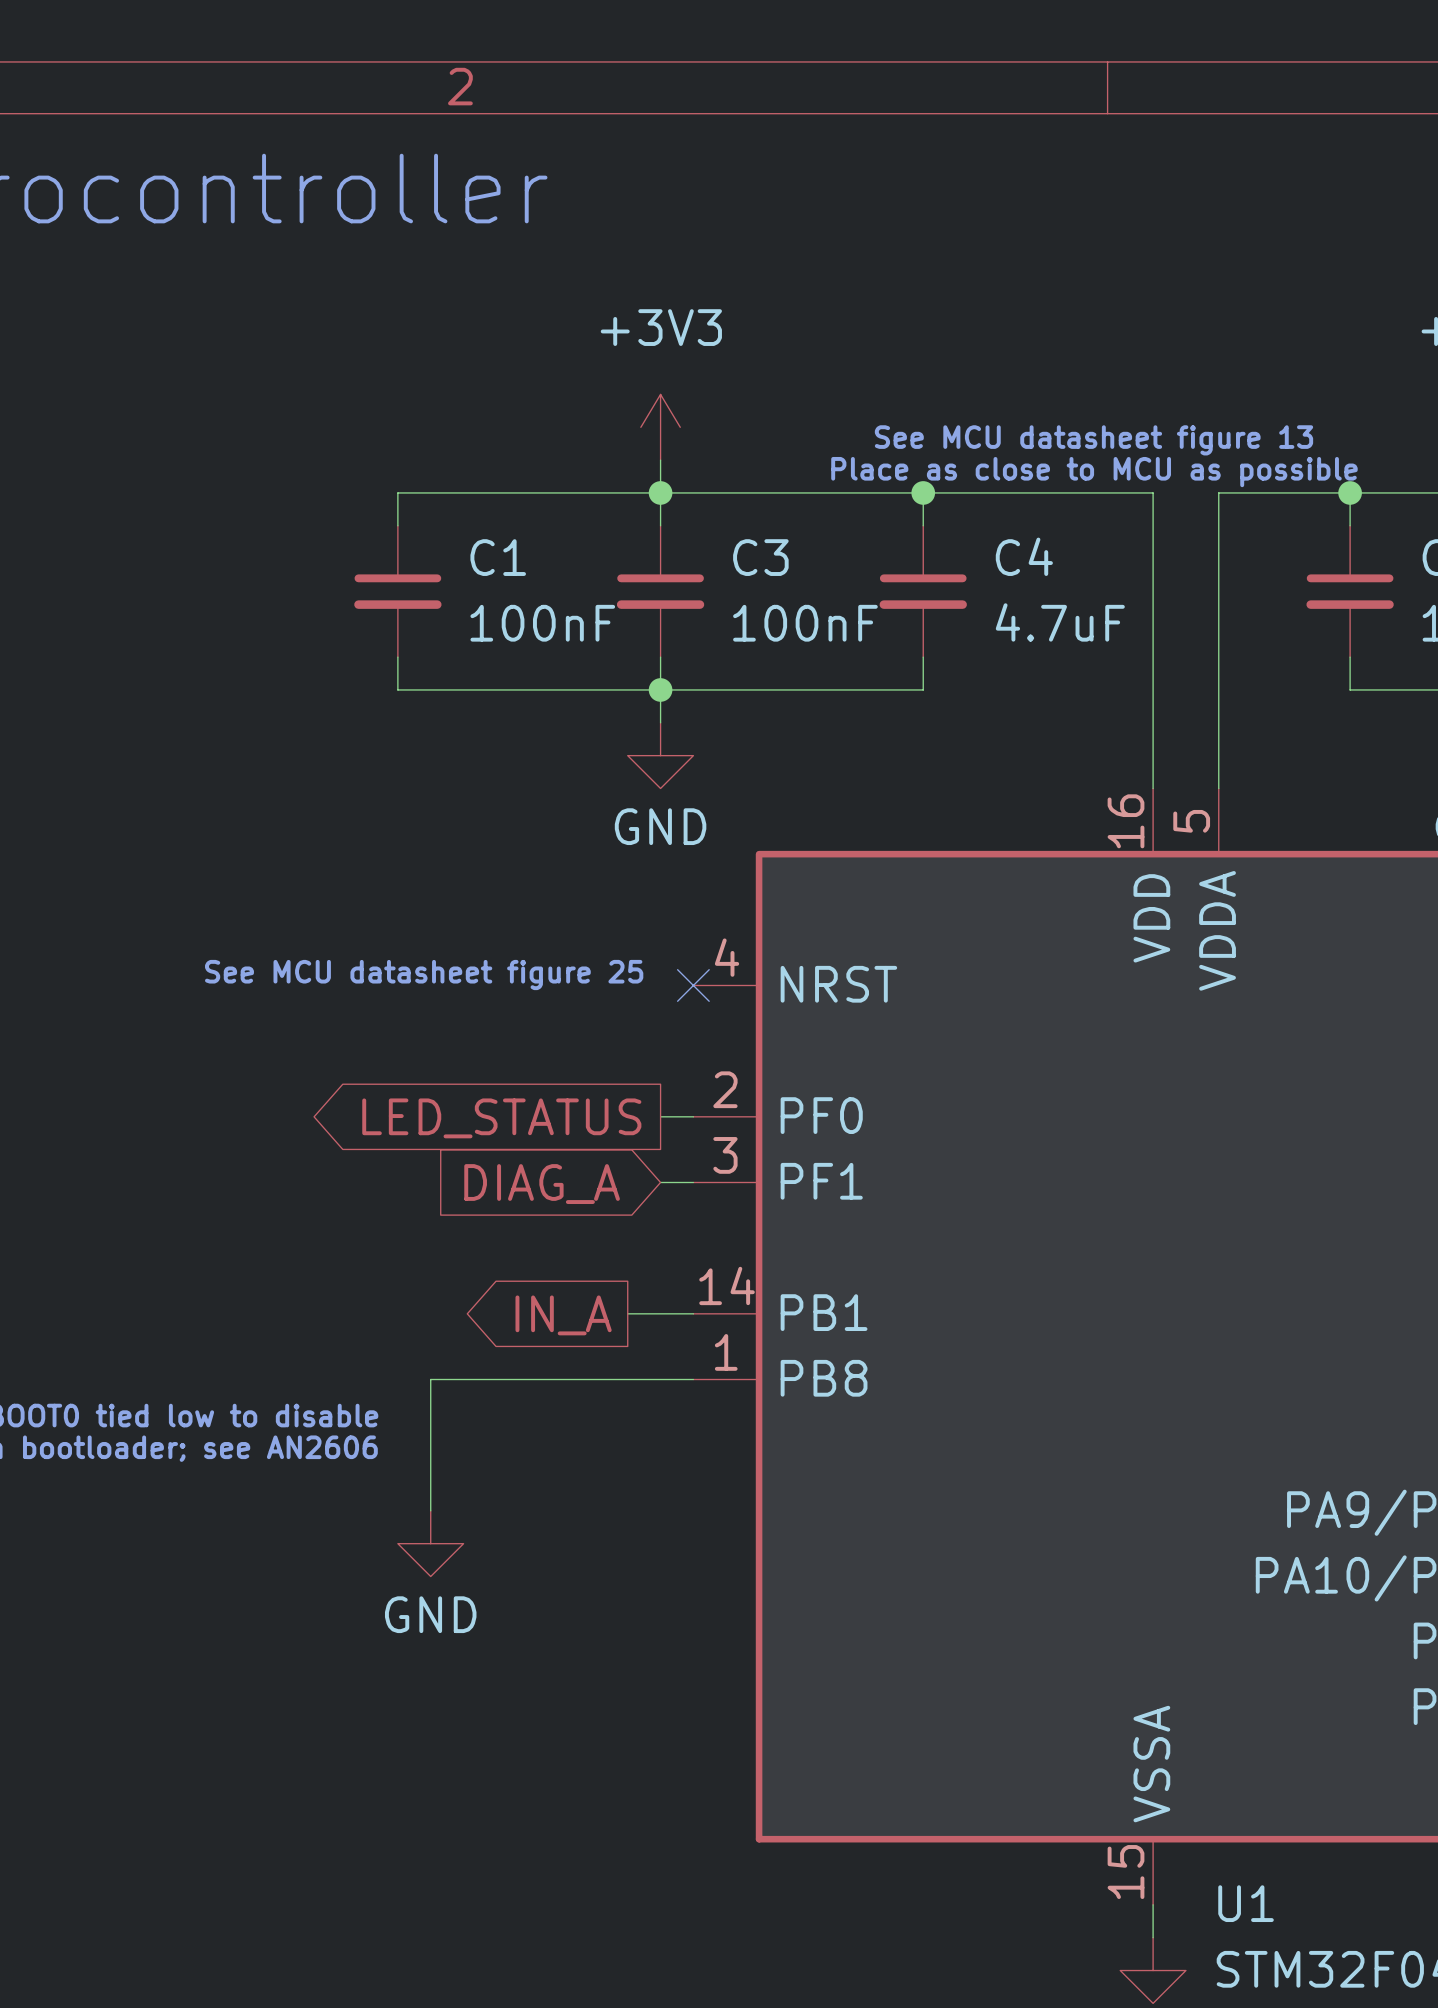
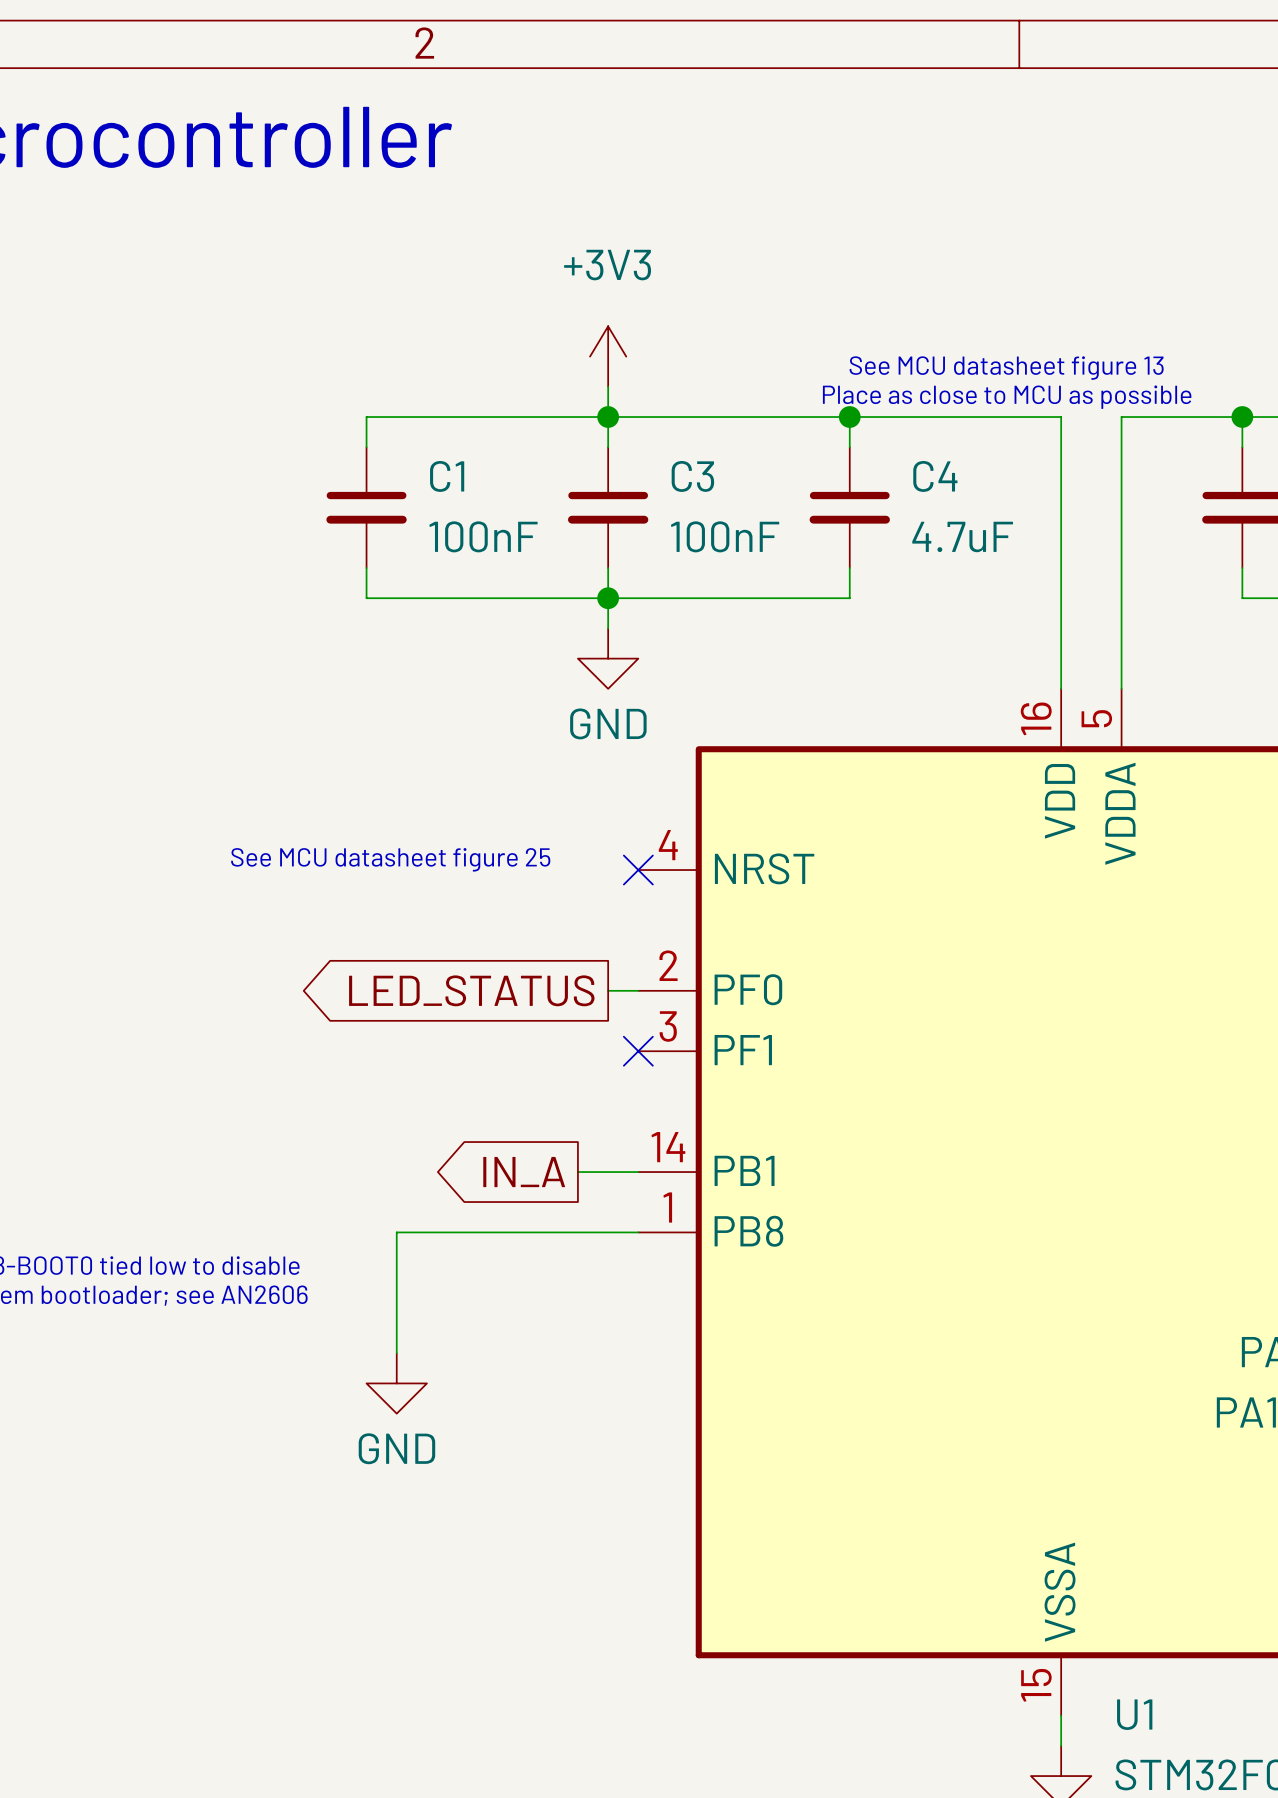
wire: (660, 1182) (693, 1182) -> none
no-connect mark: none -> (638, 1051)
global label: DIAG_A (542, 1184) -> none

